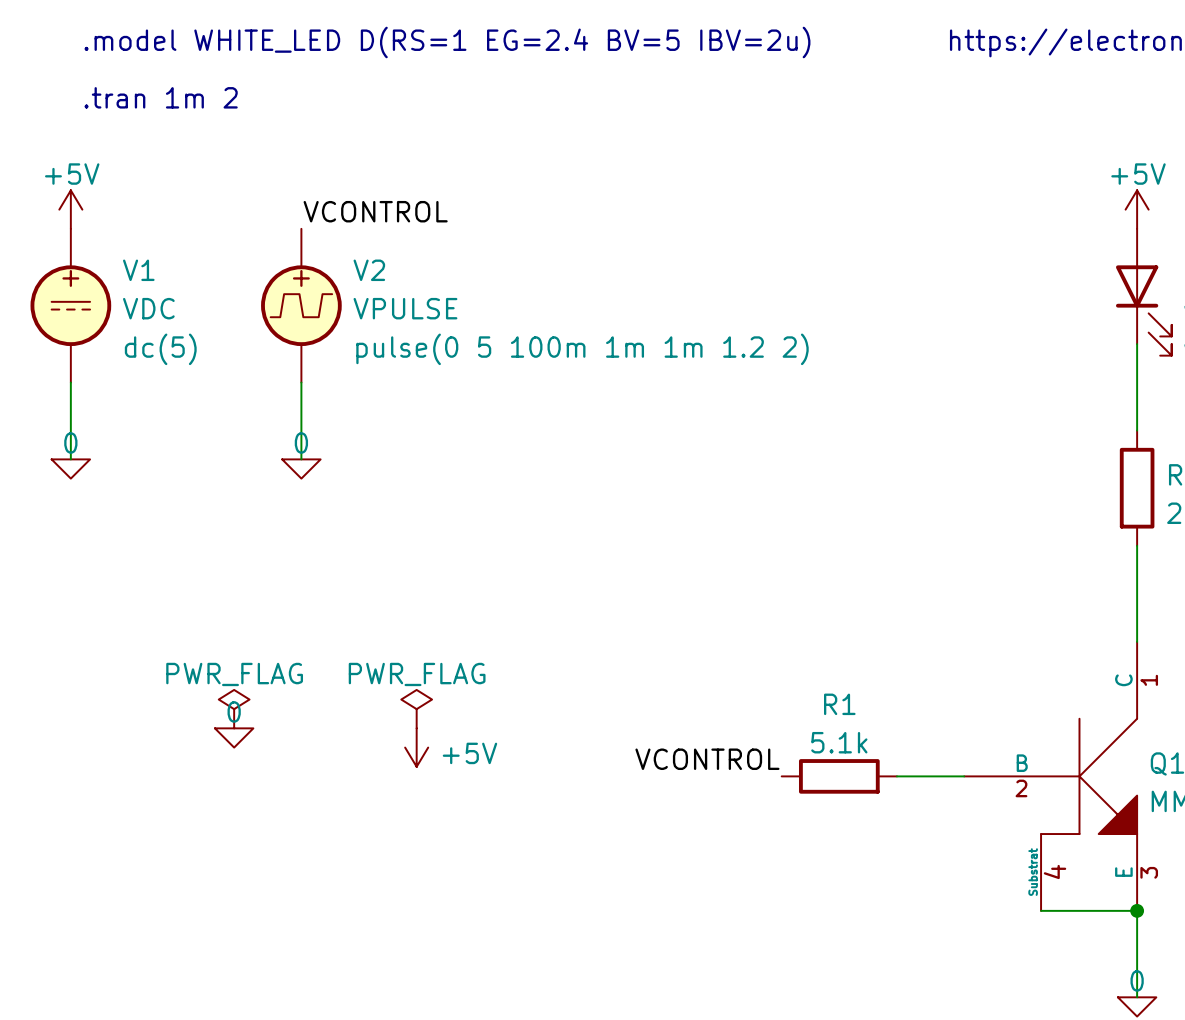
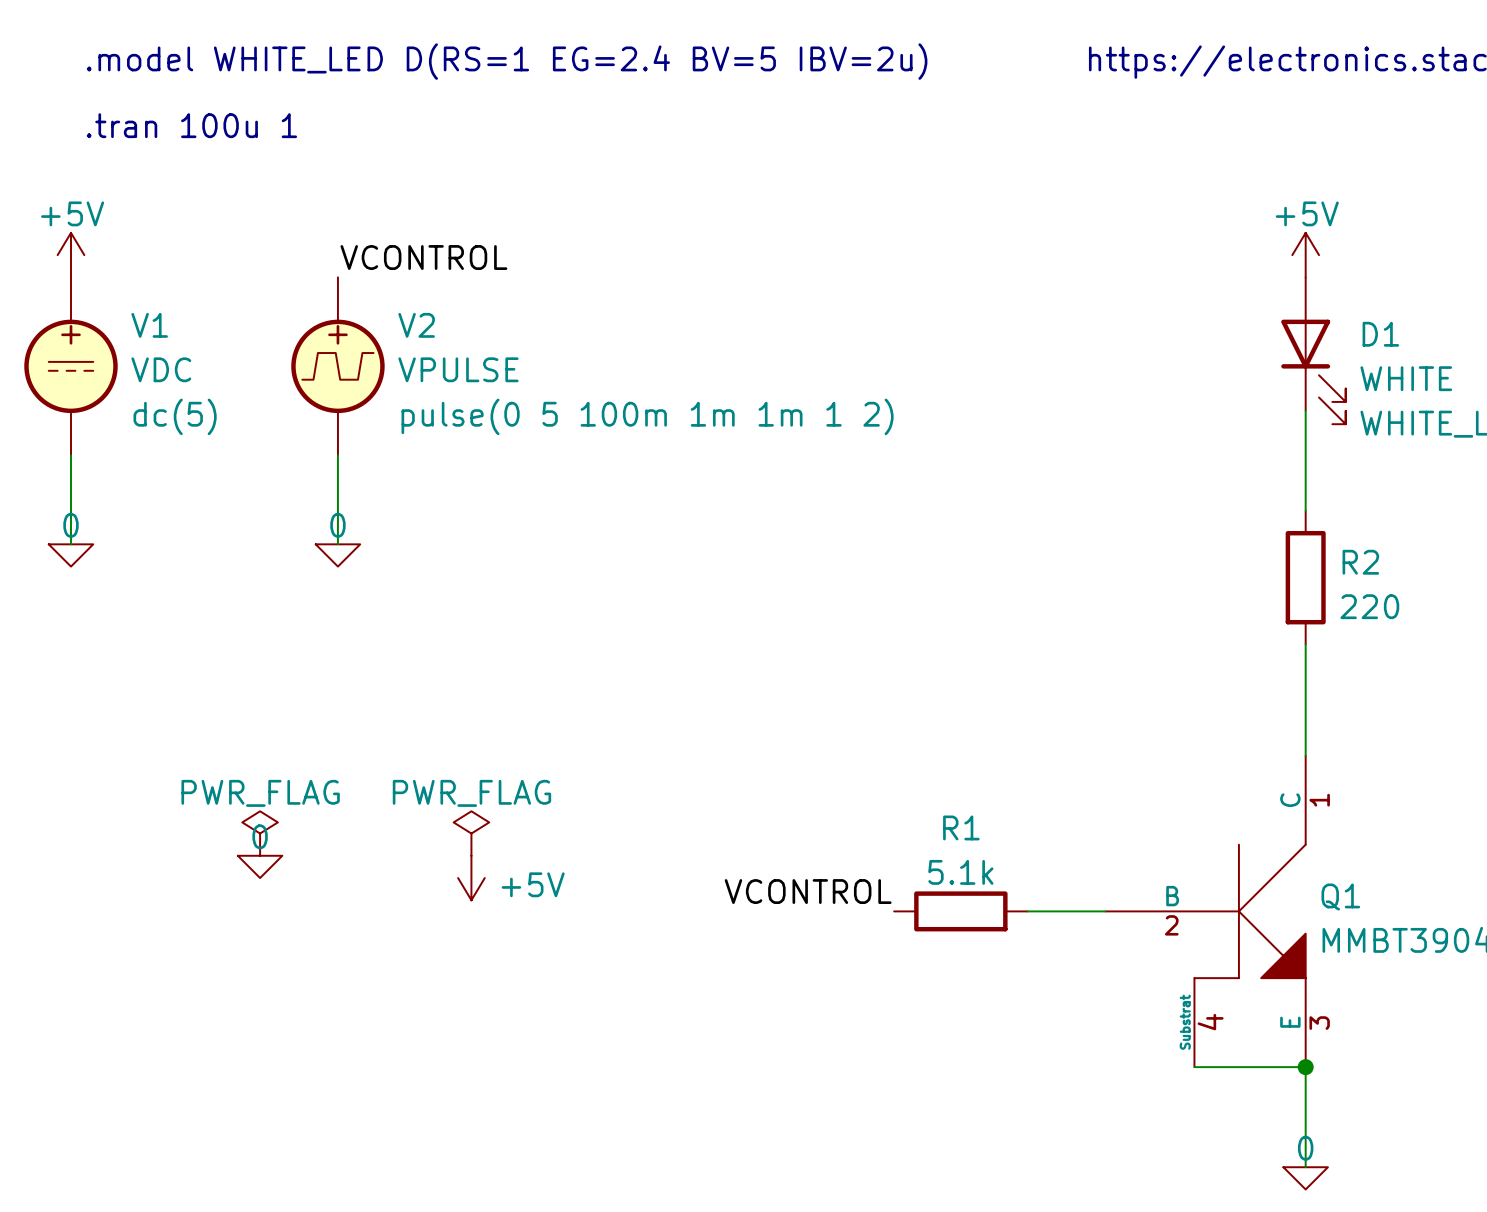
text: .tran 1m 2 (161, 97) -> .tran 100u 1 (191, 125)
V2 text: pulse(0 5 100m 1m 1m 1.2 2) (582, 349) -> pulse(0 5 100m 1m 1m 1 2) (647, 416)

